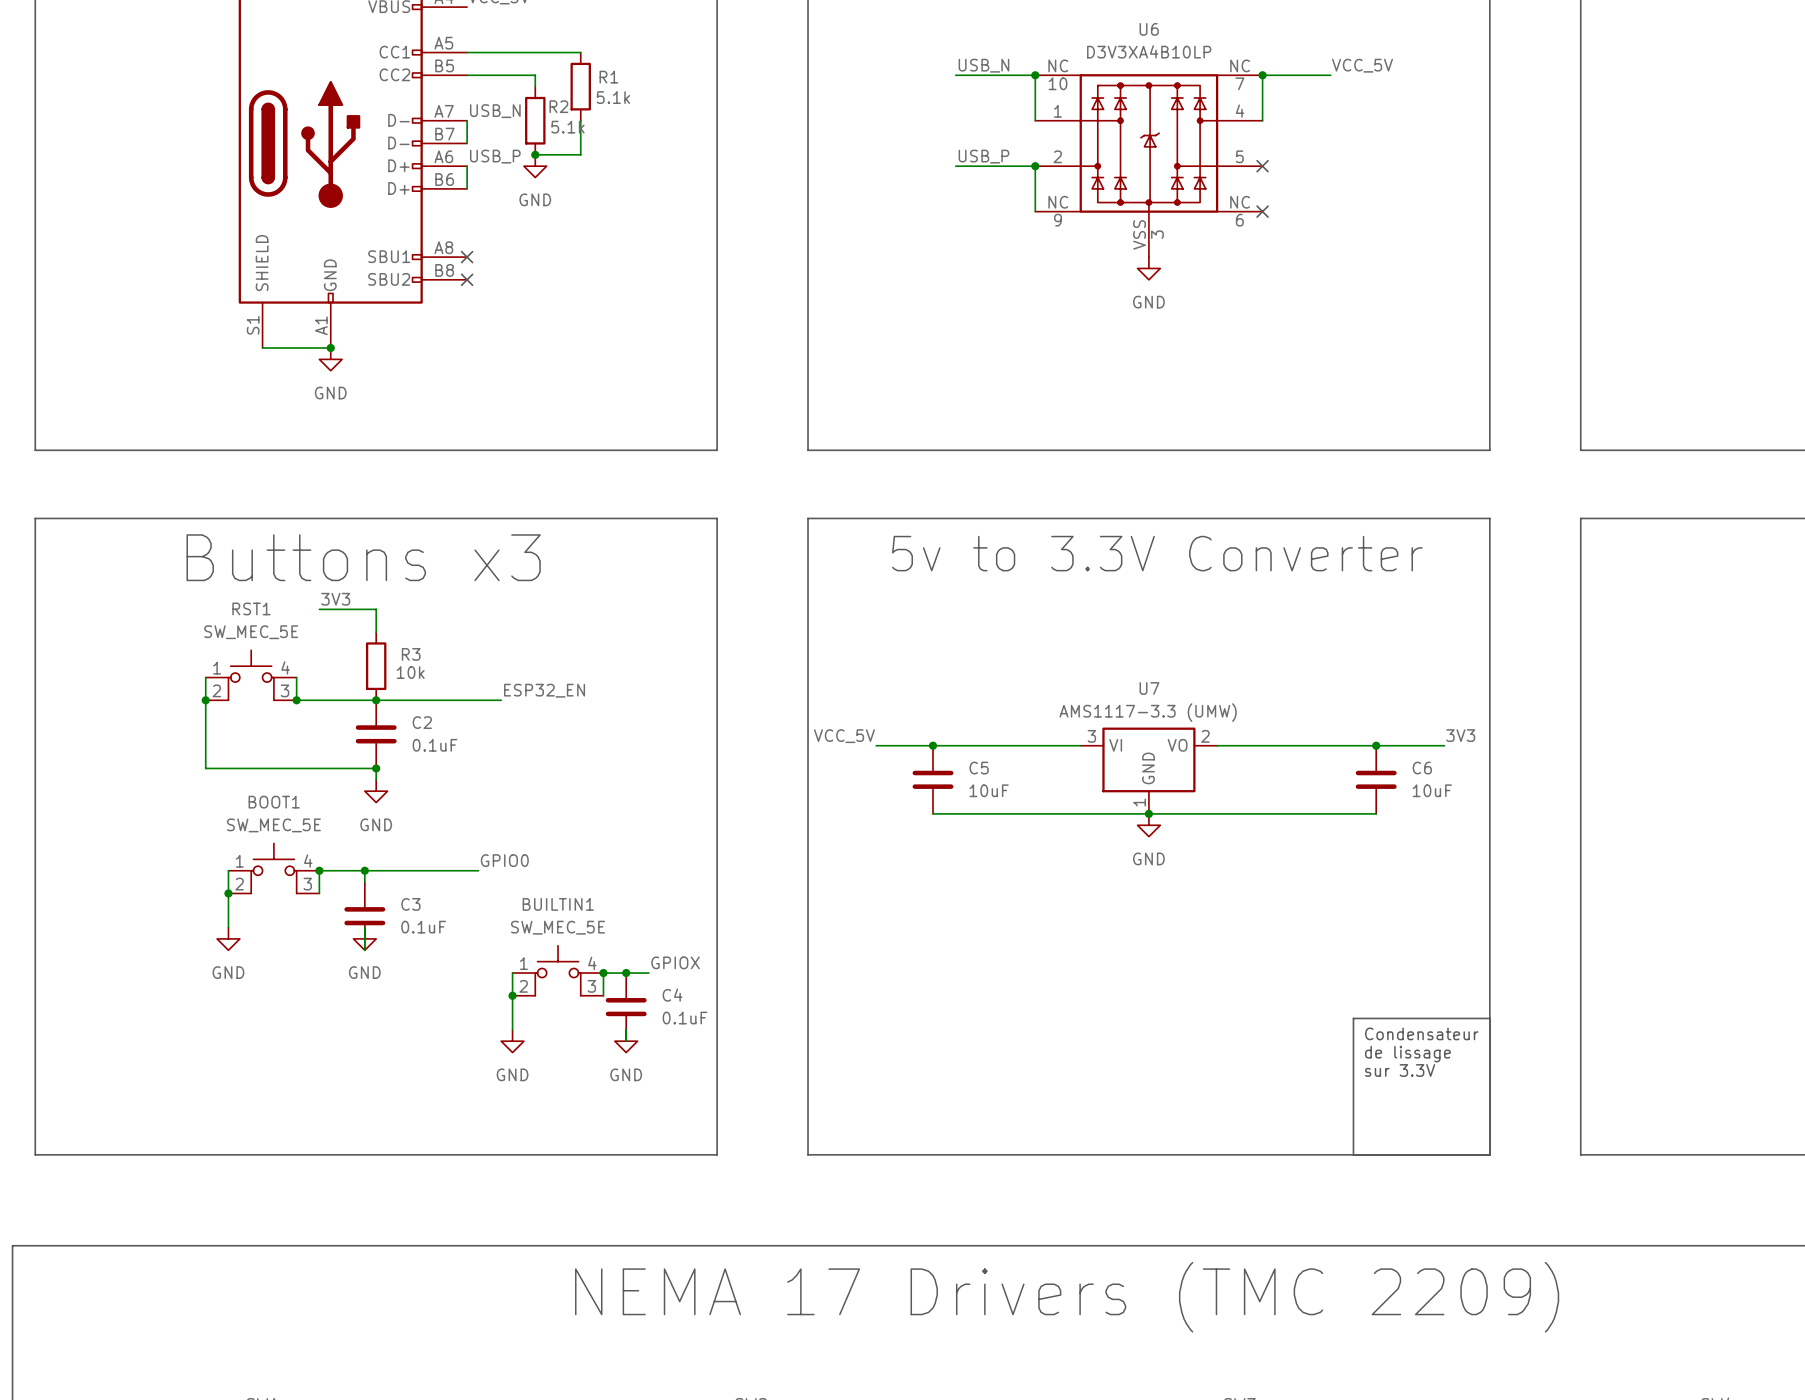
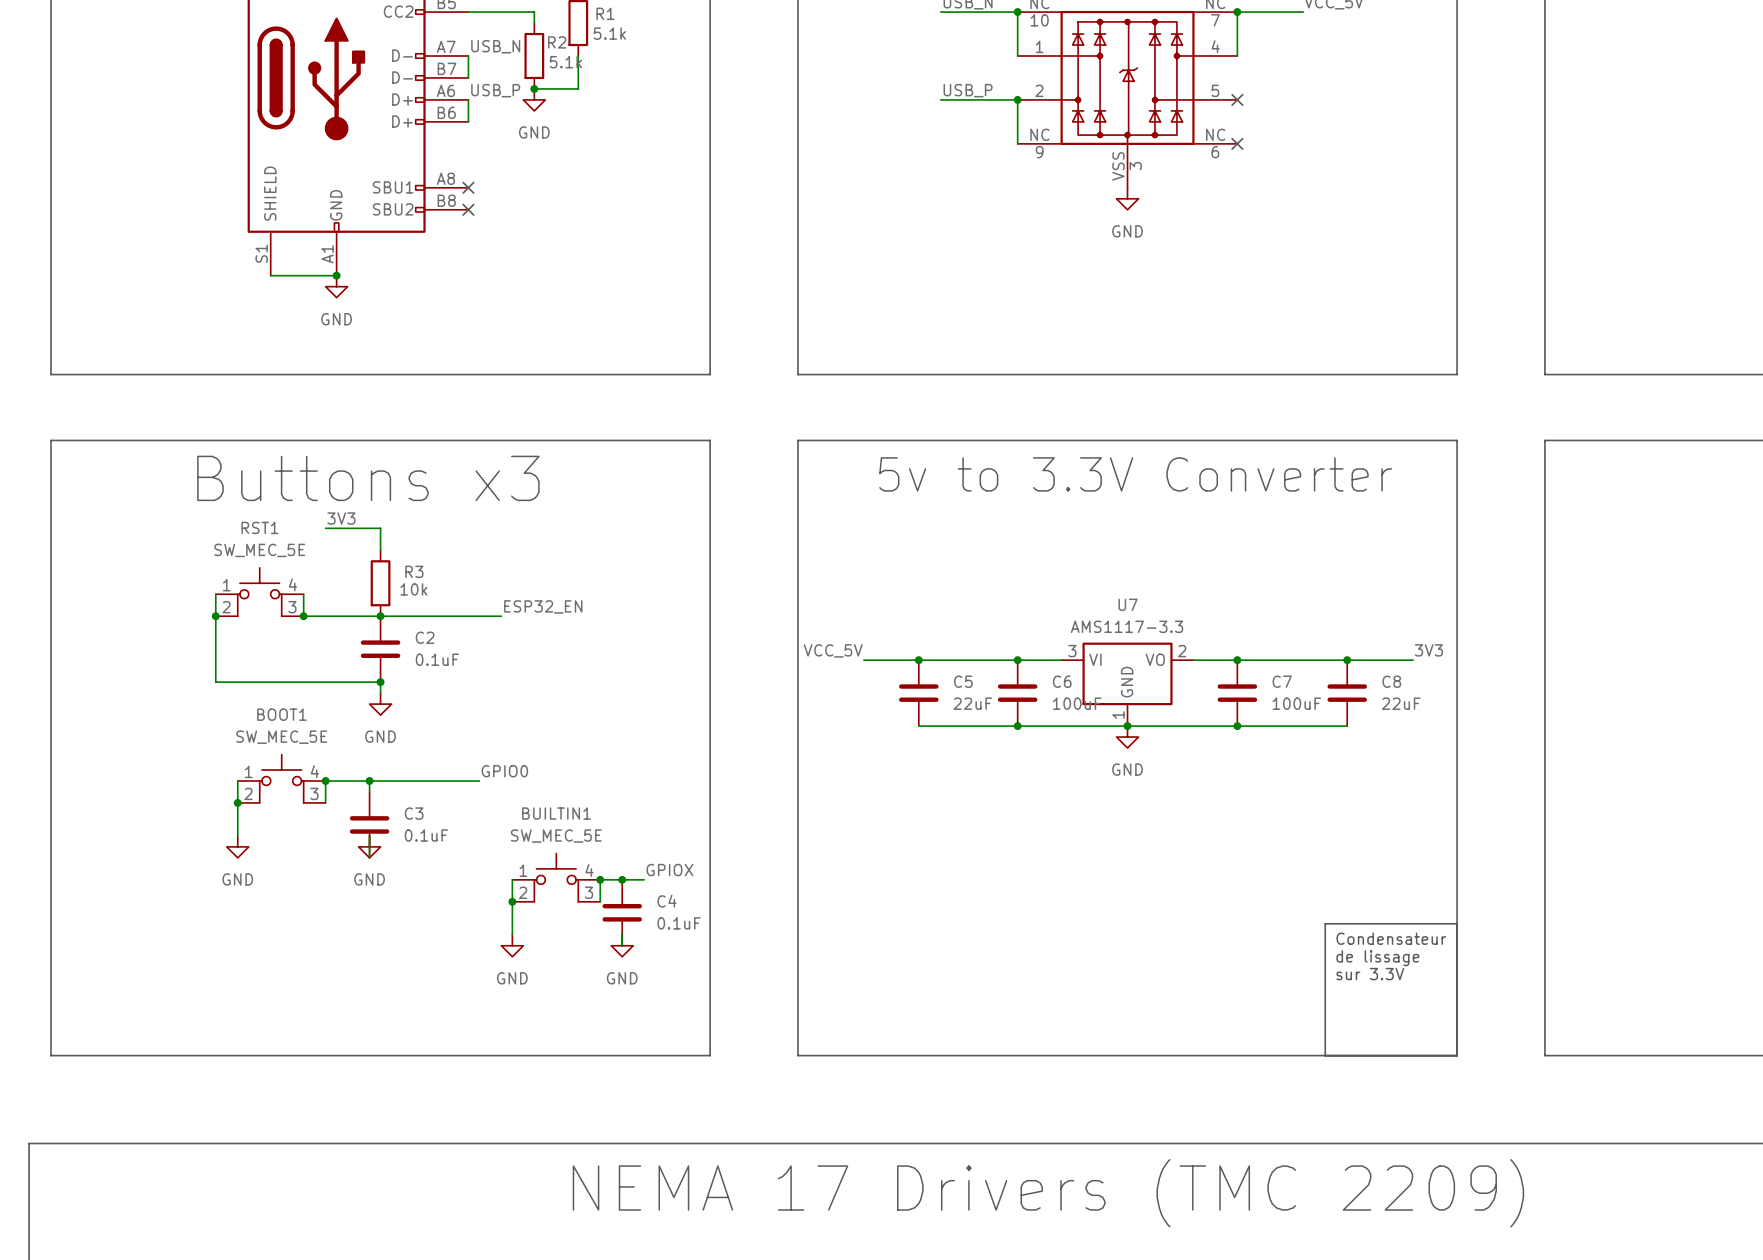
U7 value: AMS1117-3.3 (UMW) (1148, 712) -> AMS1117-3.3 (1127, 626)
junction: none -> (1017, 660)
junction: none -> (1237, 660)
C6 name: C6 (1422, 768) -> C8 (1391, 681)
C6: none -> 100uF (1017, 693)
C7: none -> 100uF (1237, 693)
C5 value: 10uF (989, 790) -> 22uF (972, 703)
C6 value: 10uF (1432, 790) -> 22uF (1401, 703)
junction: none -> (1017, 726)
junction: none -> (1237, 726)

